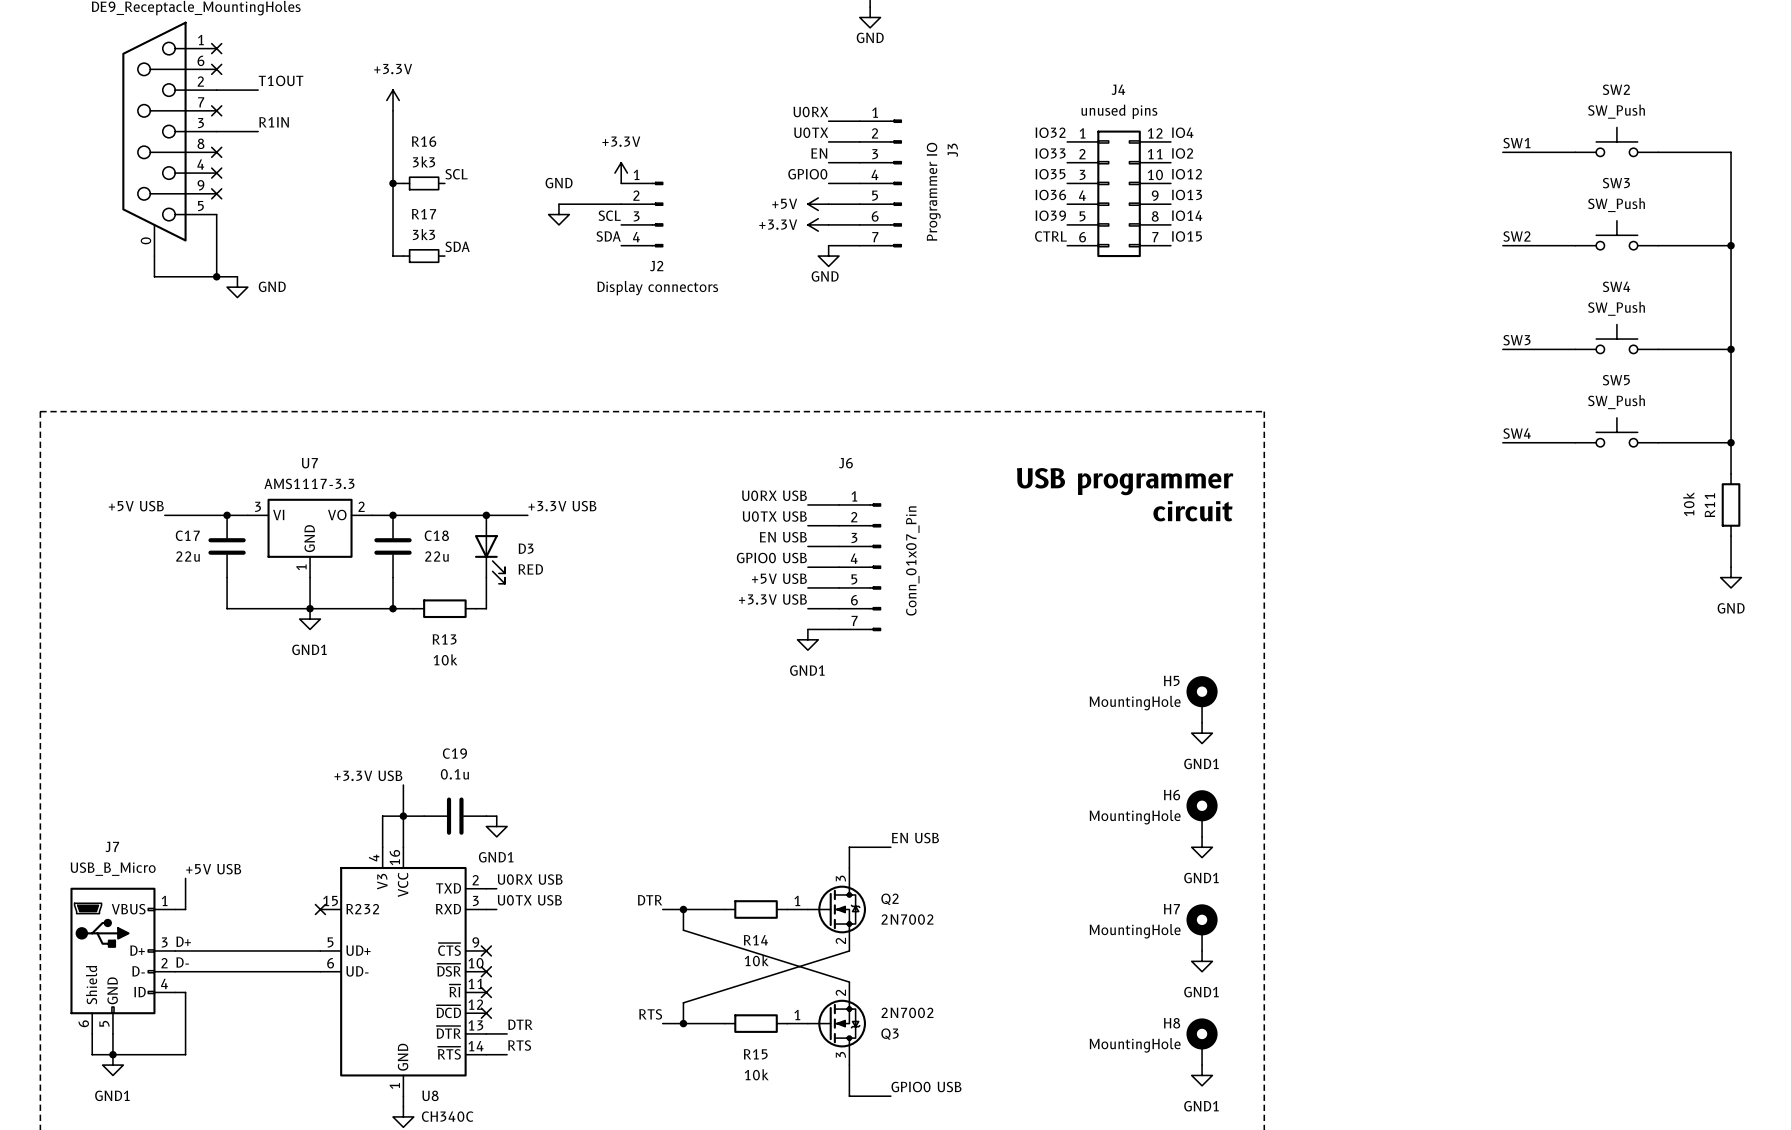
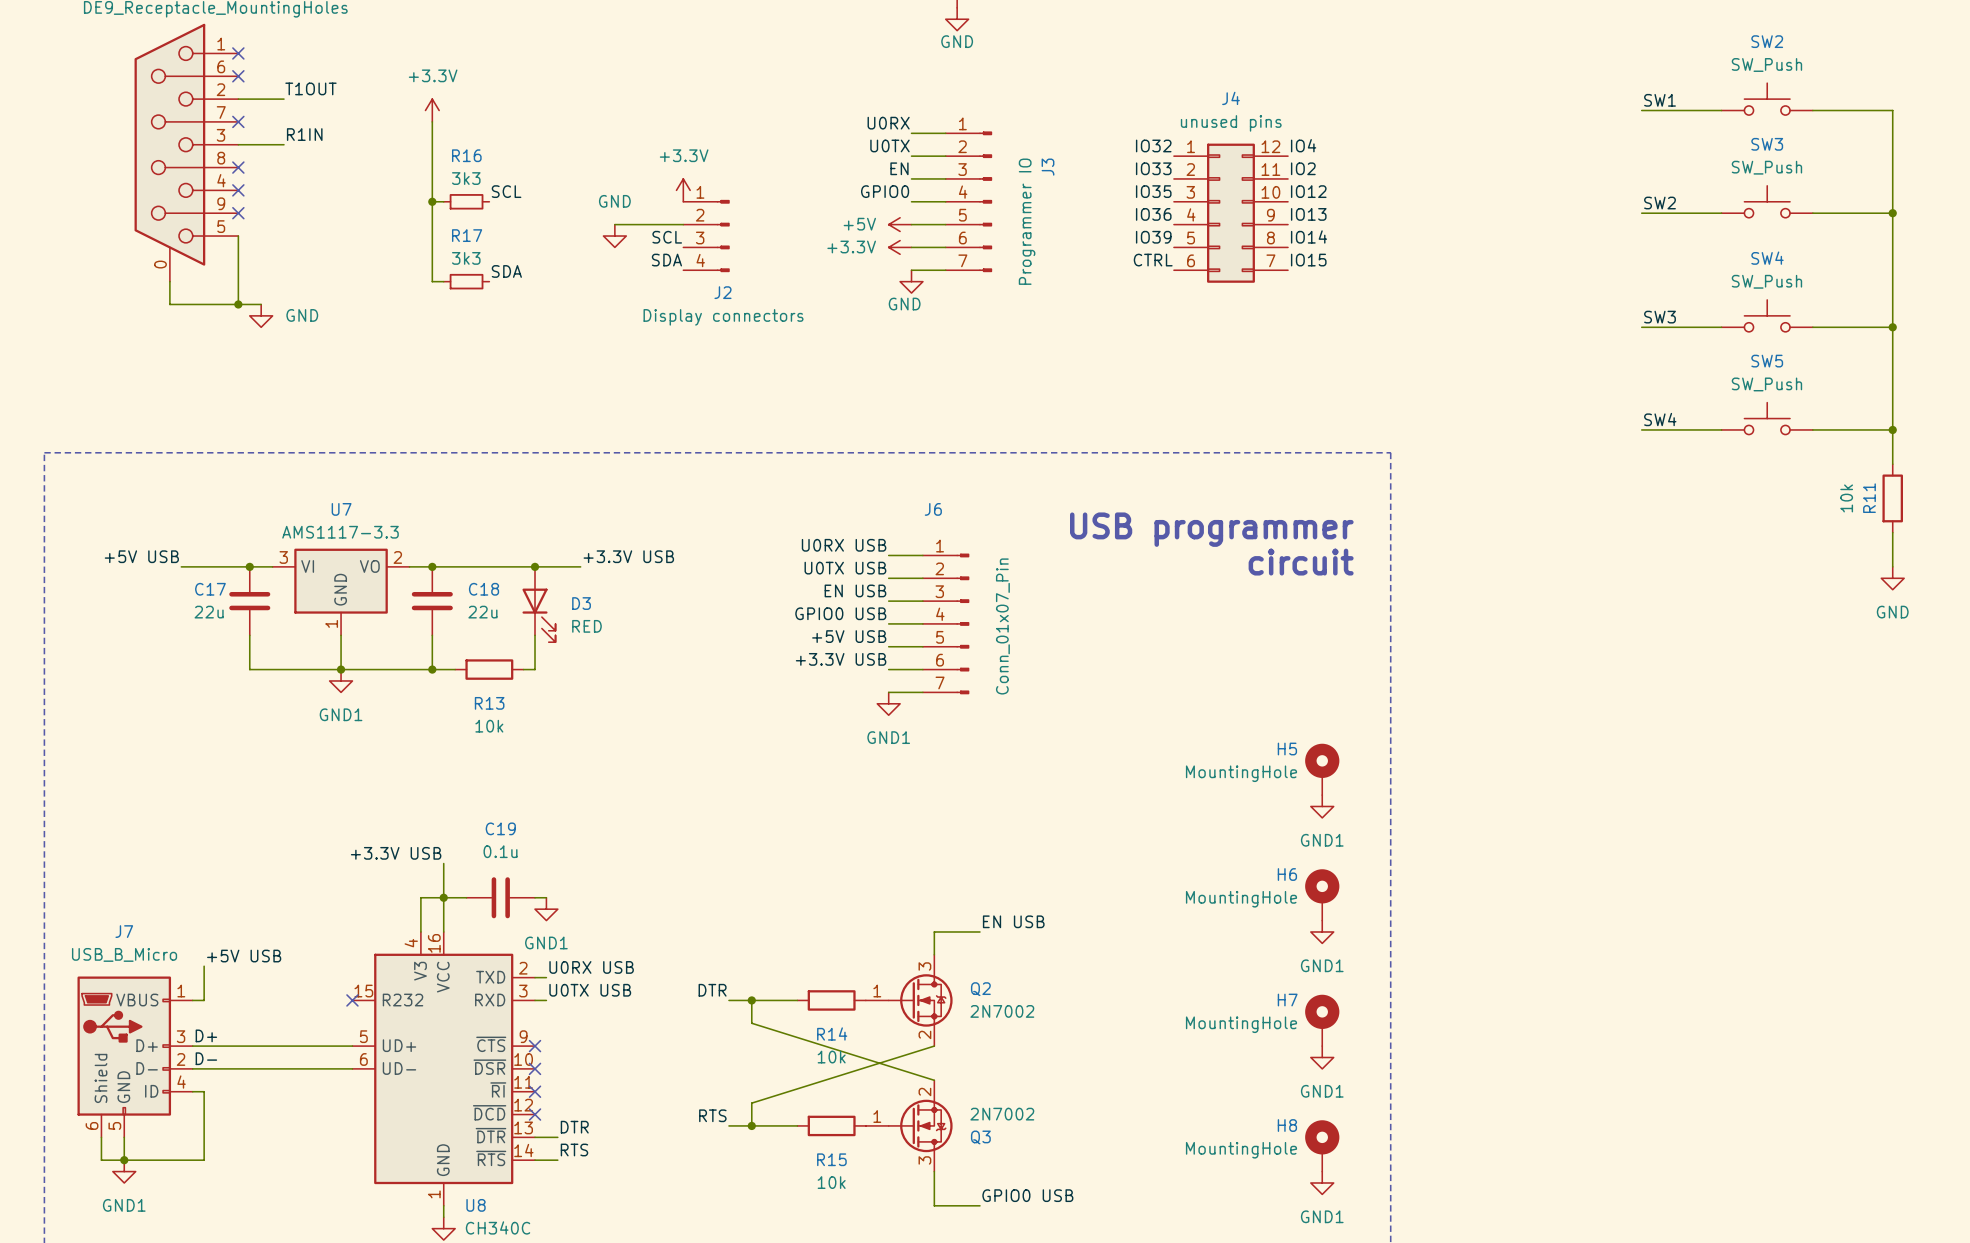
SW2 position: (1616, 141) -> (1767, 99)
label position: SW1 (1516, 143) -> SW1 (1660, 100)
wire: (1502, 152) (1575, 152) -> (1641, 110) (1721, 110)
wire: (1658, 152) (1731, 152) (1731, 473) -> (1812, 110) (1892, 110) (1892, 464)
junction: none -> (1892, 213)
SW3 position: (1616, 235) -> (1767, 201)
label position: SW2 (1516, 236) -> SW2 (1660, 203)
wire: (1502, 245) (1575, 245) -> (1641, 213) (1721, 213)
wire: (1658, 245) (1731, 245) -> (1812, 213) (1892, 213)
junction: (1731, 245) -> none
junction: none -> (1892, 327)
SW4 position: (1616, 339) -> (1767, 315)
label position: SW3 (1516, 340) -> SW3 (1660, 317)
wire: (1502, 349) (1575, 349) -> (1641, 327) (1721, 327)
wire: (1658, 349) (1731, 349) -> (1812, 327) (1892, 327)
junction: (1731, 349) -> none
junction: none -> (1892, 429)
SW5 position: (1616, 432) -> (1767, 418)
label position: SW4 (1517, 433) -> SW4 (1660, 419)
wire: (1502, 442) (1575, 442) -> (1641, 429) (1721, 429)
wire: (1658, 442) (1731, 442) -> (1812, 429) (1892, 429)
junction: (1731, 442) -> none
R11 position: (1731, 504) -> (1892, 498)
wire: (1731, 536) (1731, 567) -> (1892, 532) (1892, 566)
power symbol position: GND (1731, 577) -> GND (1892, 578)

